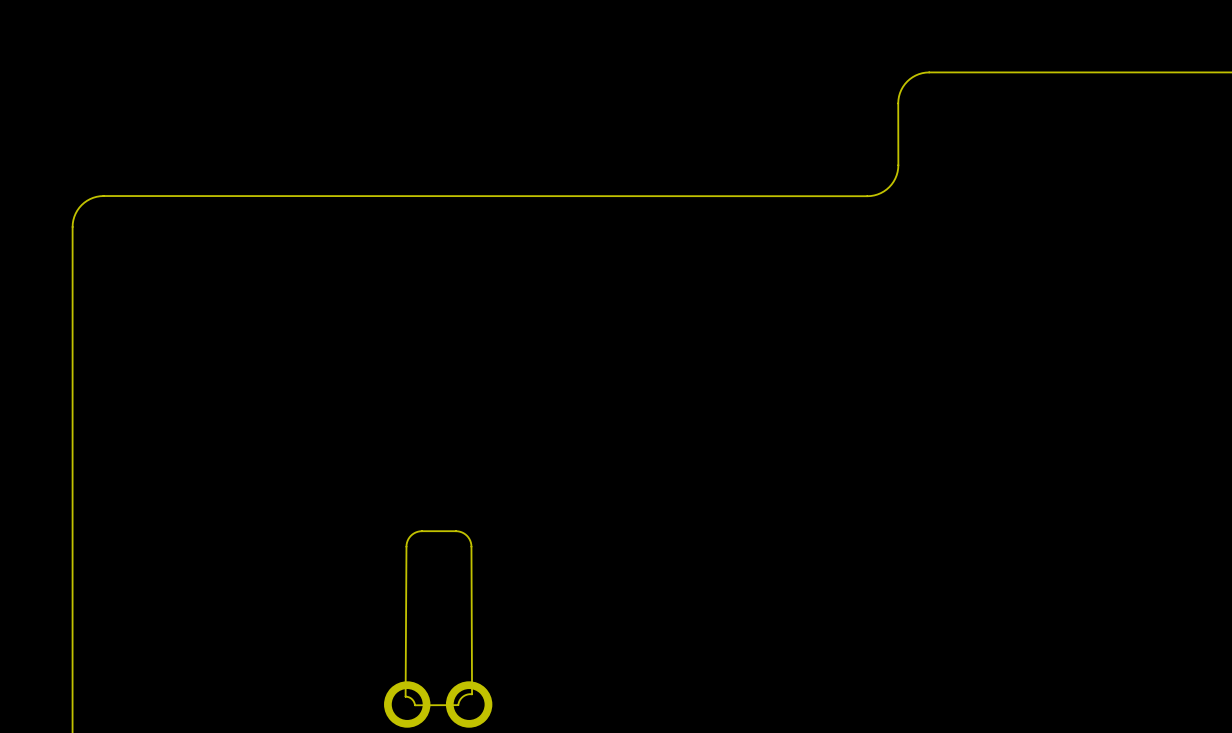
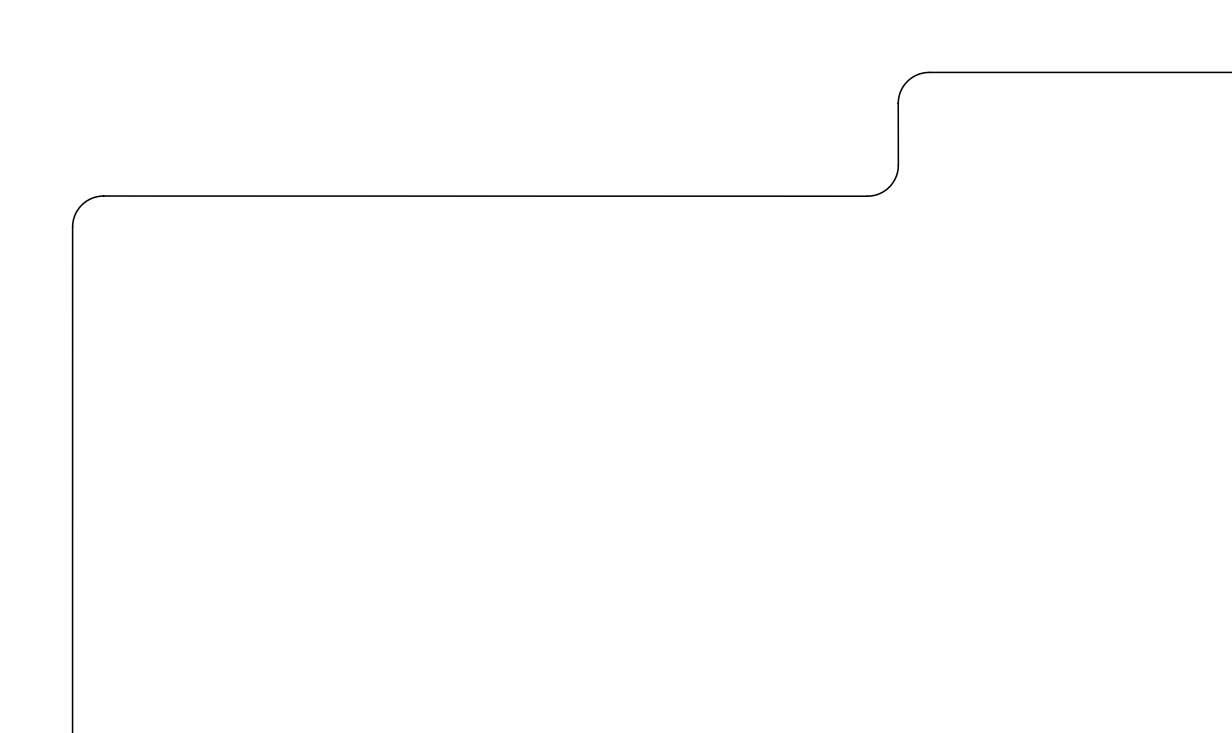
part: (438, 629) -> none

